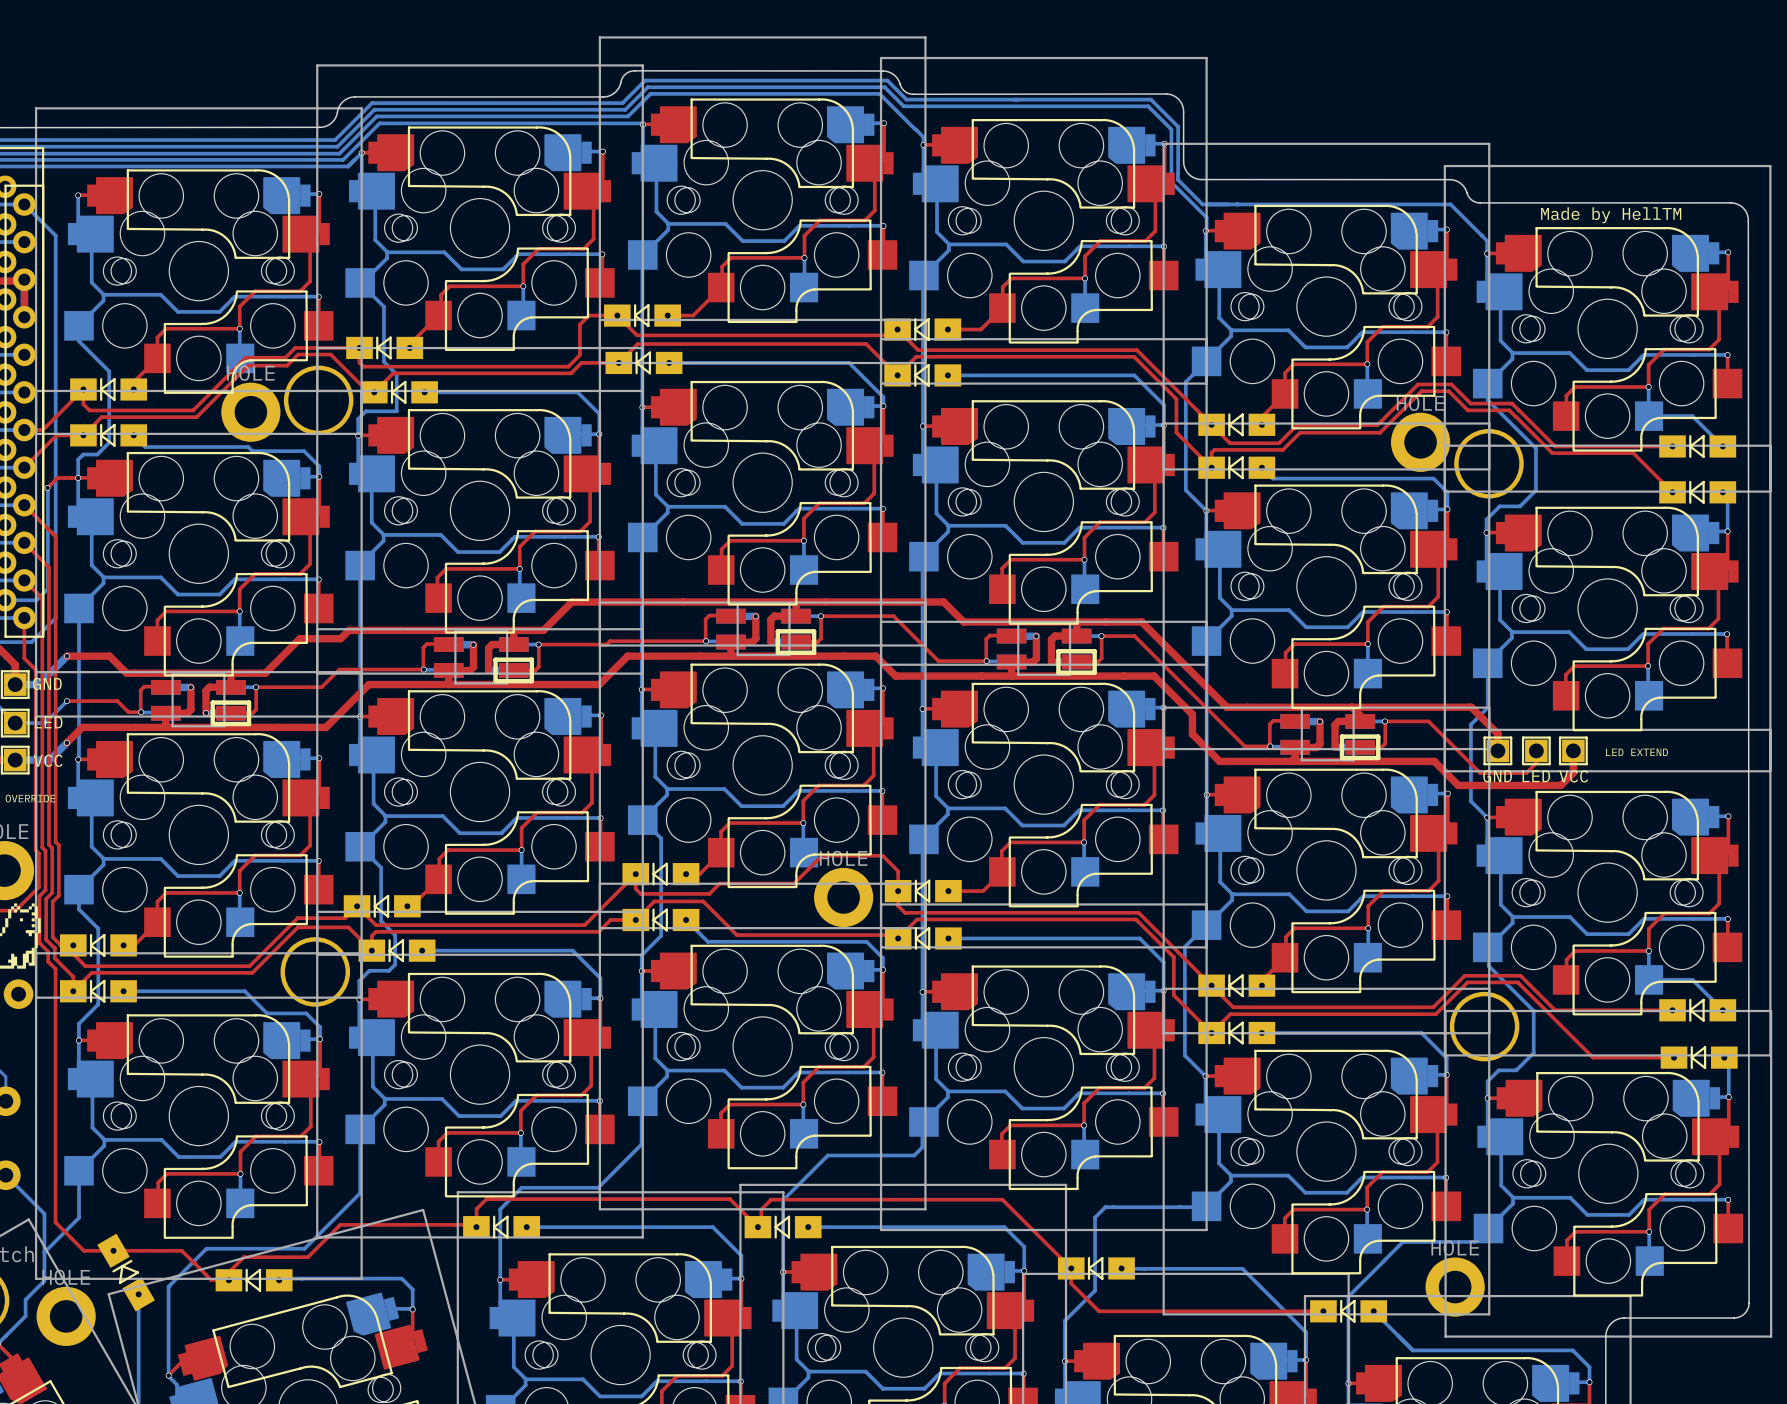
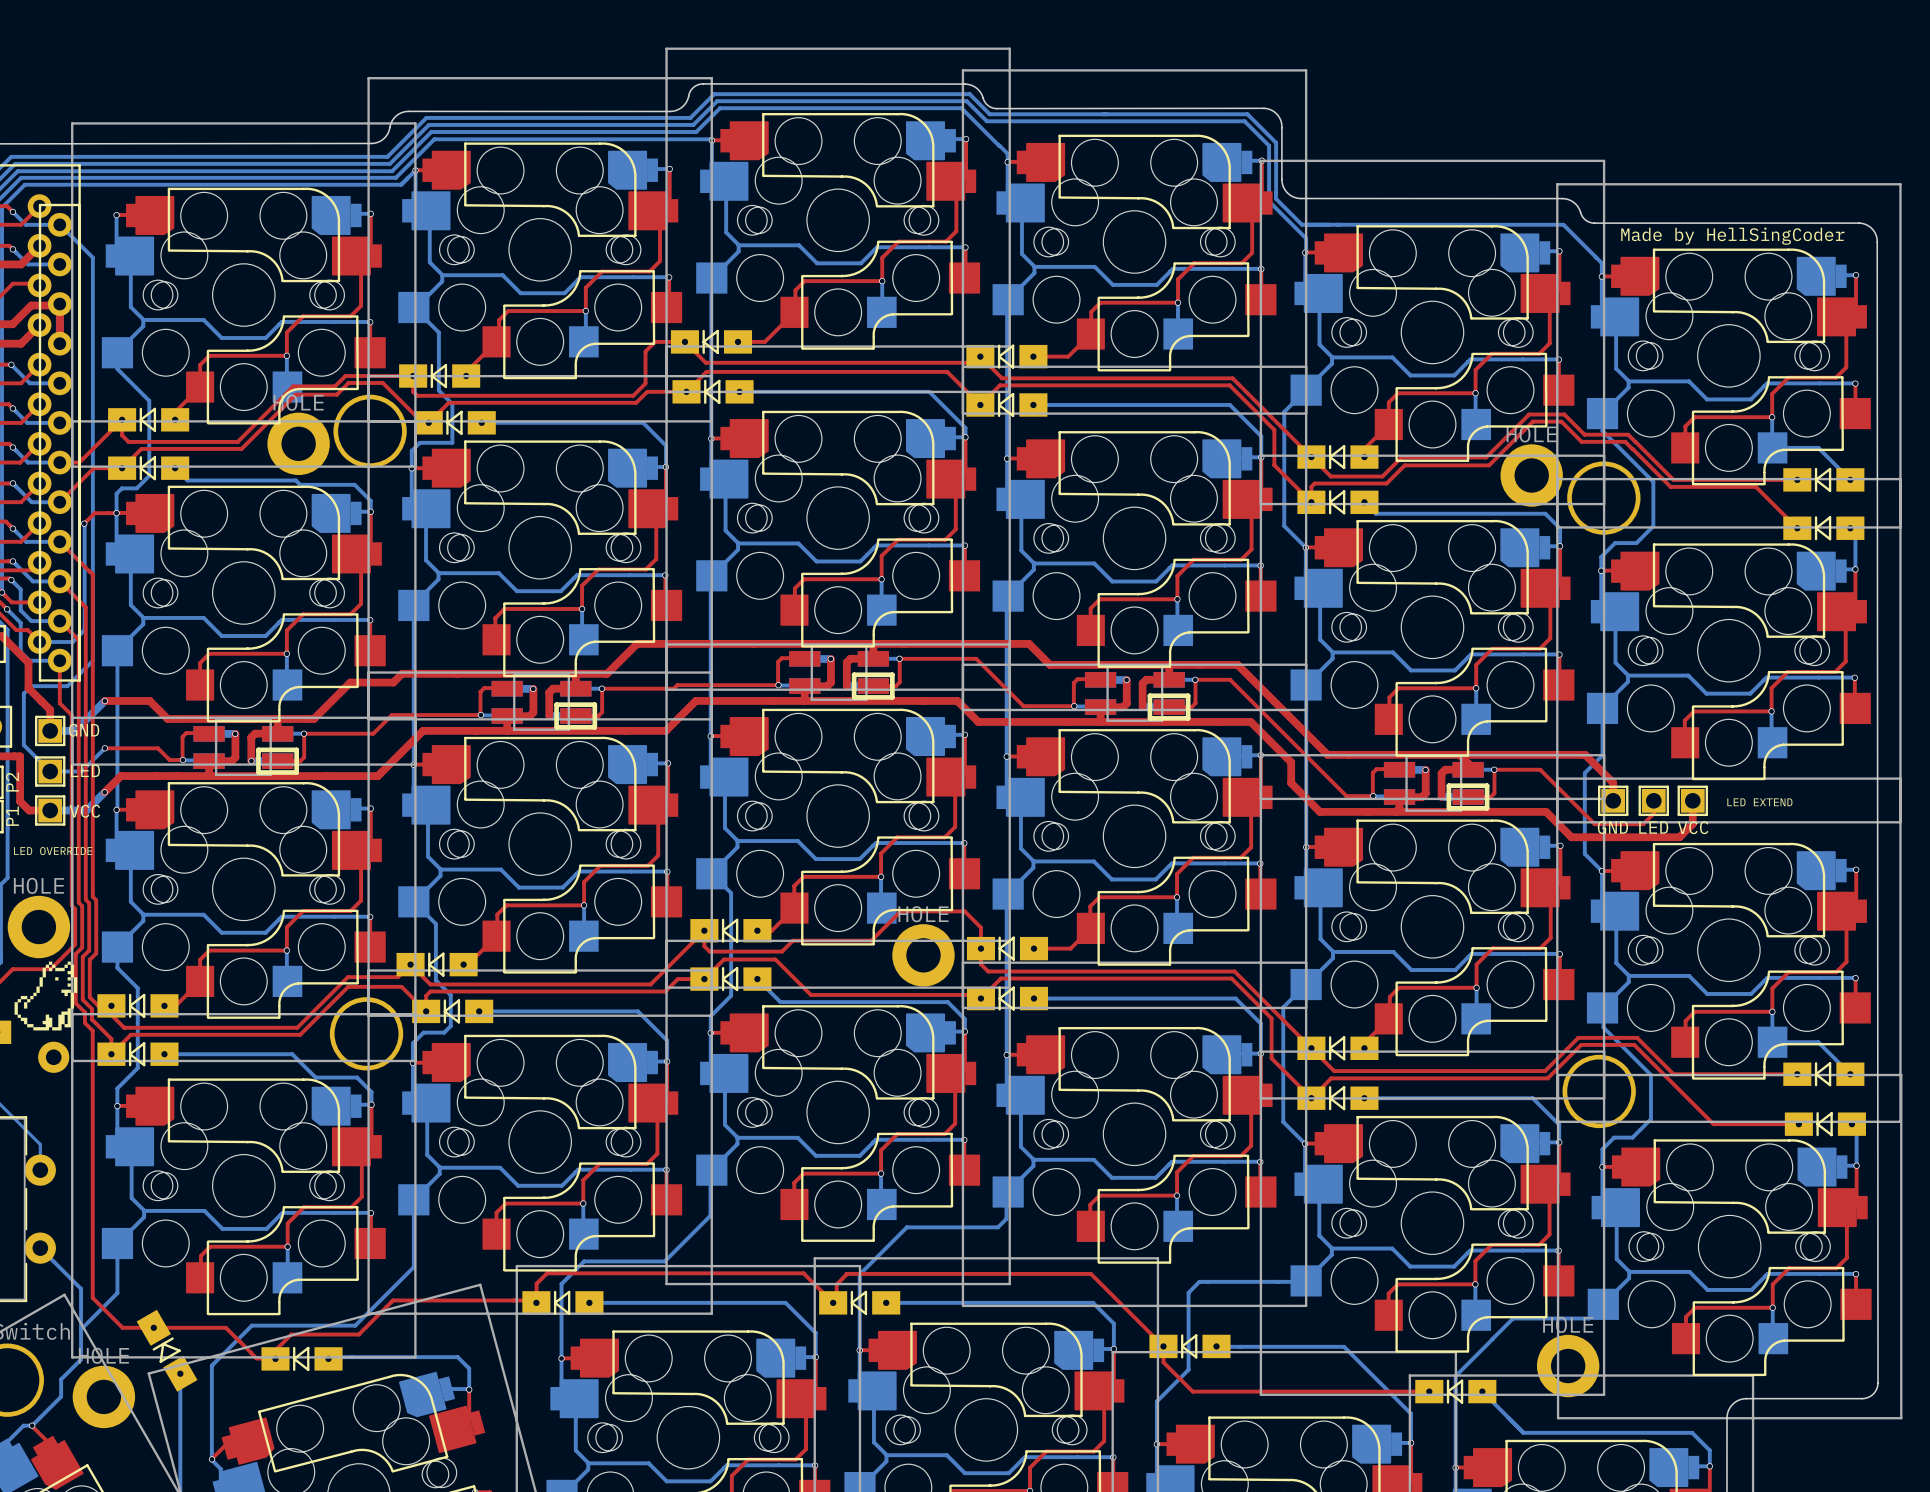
text: Made by HellTM (1611, 215) -> Made by HellSingCoder (1732, 236)

